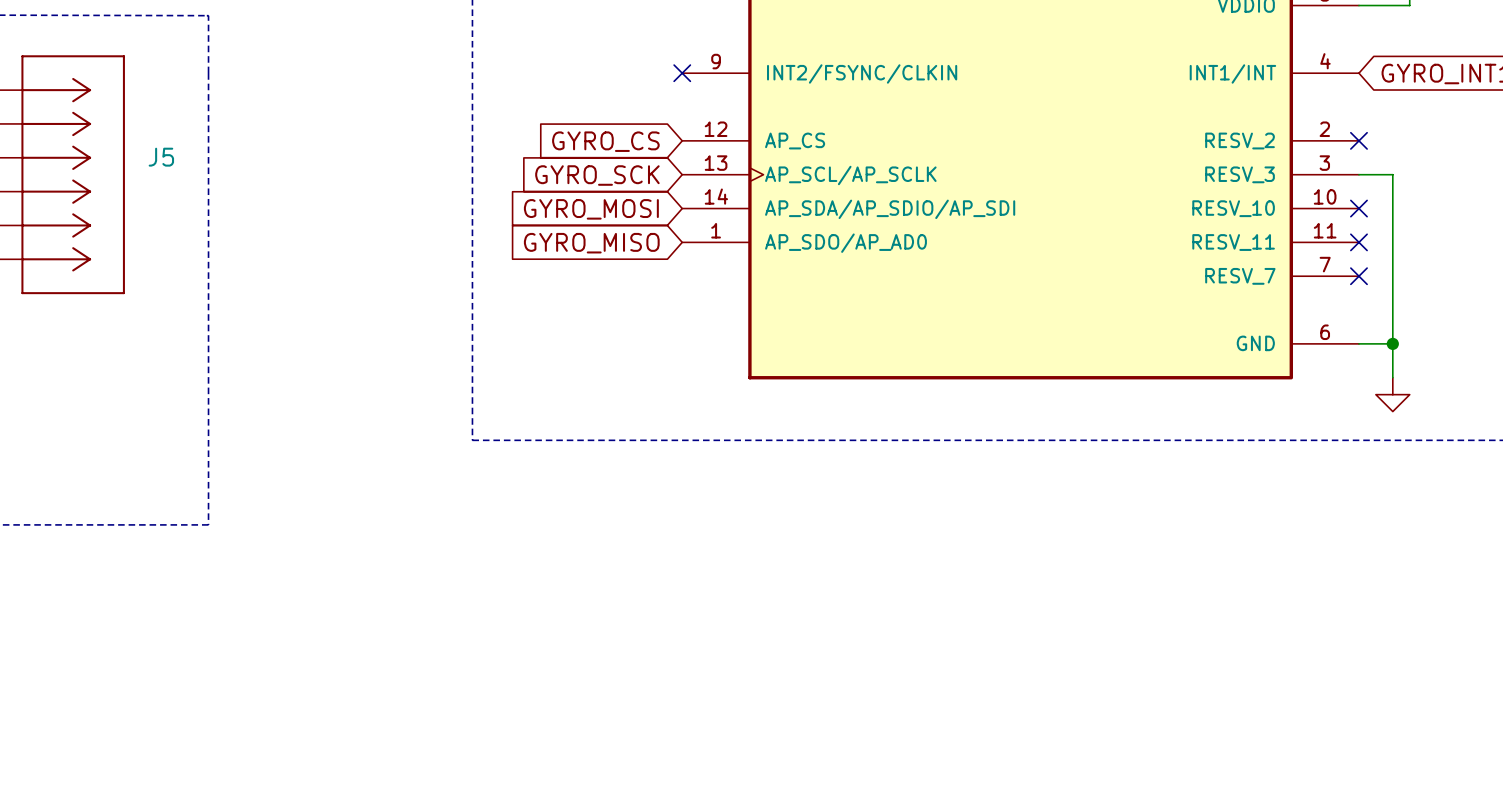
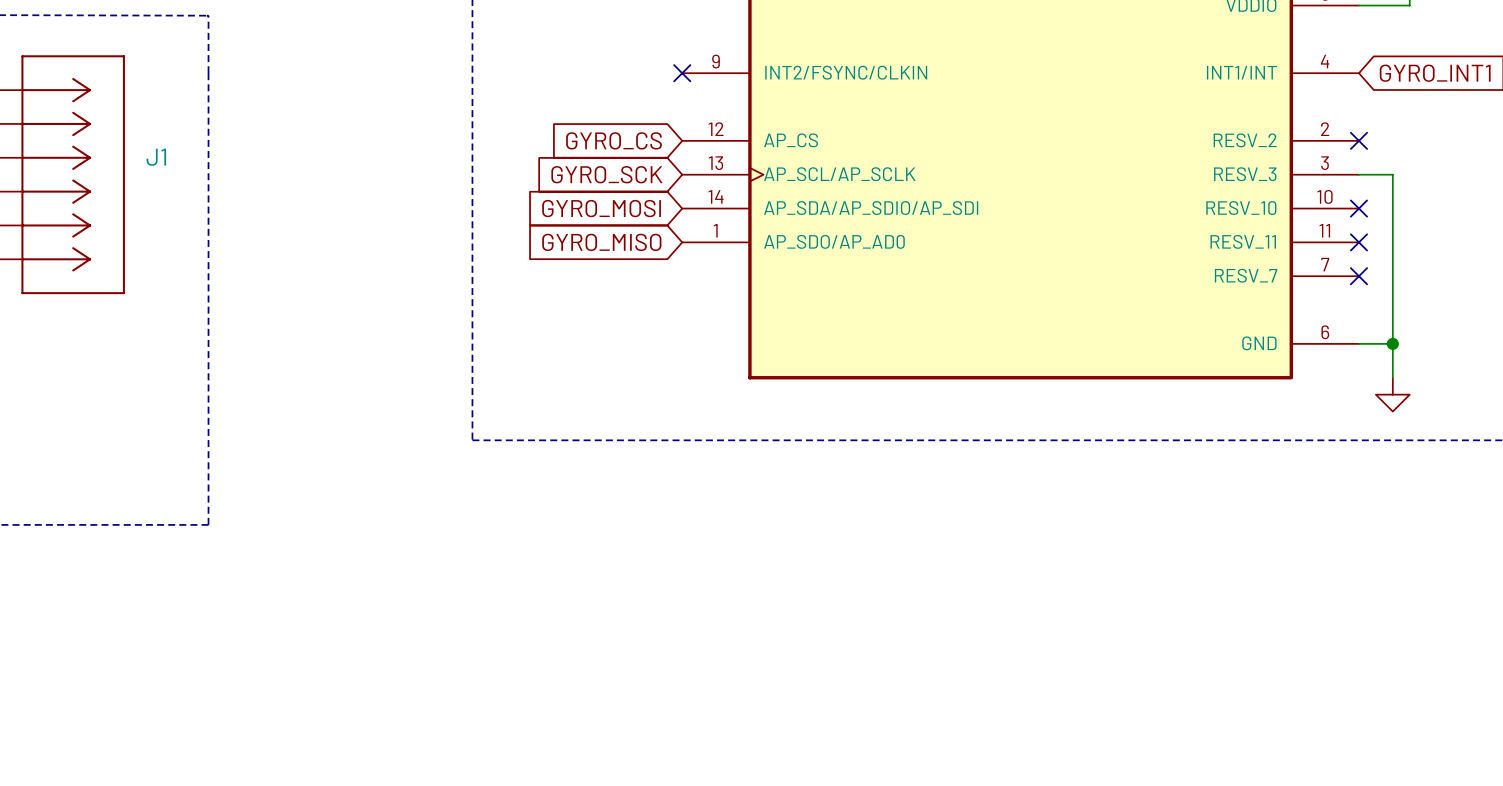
J5 name: J5 (161, 157) -> J1 (156, 157)

